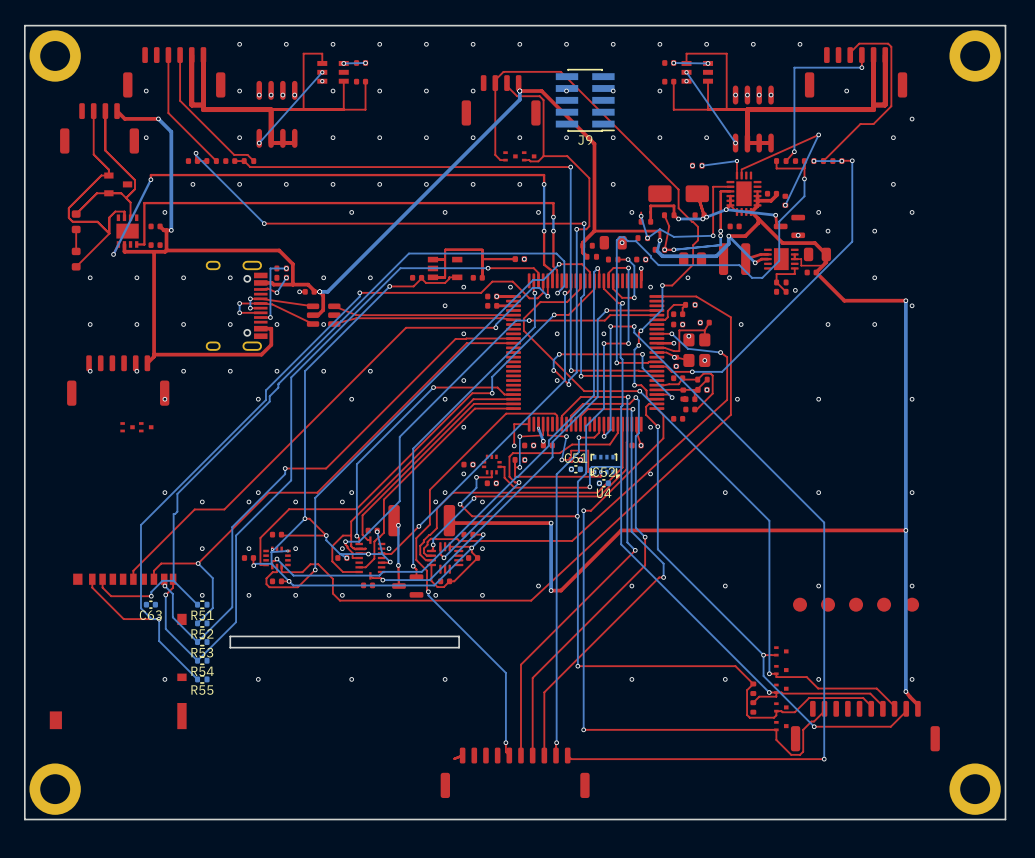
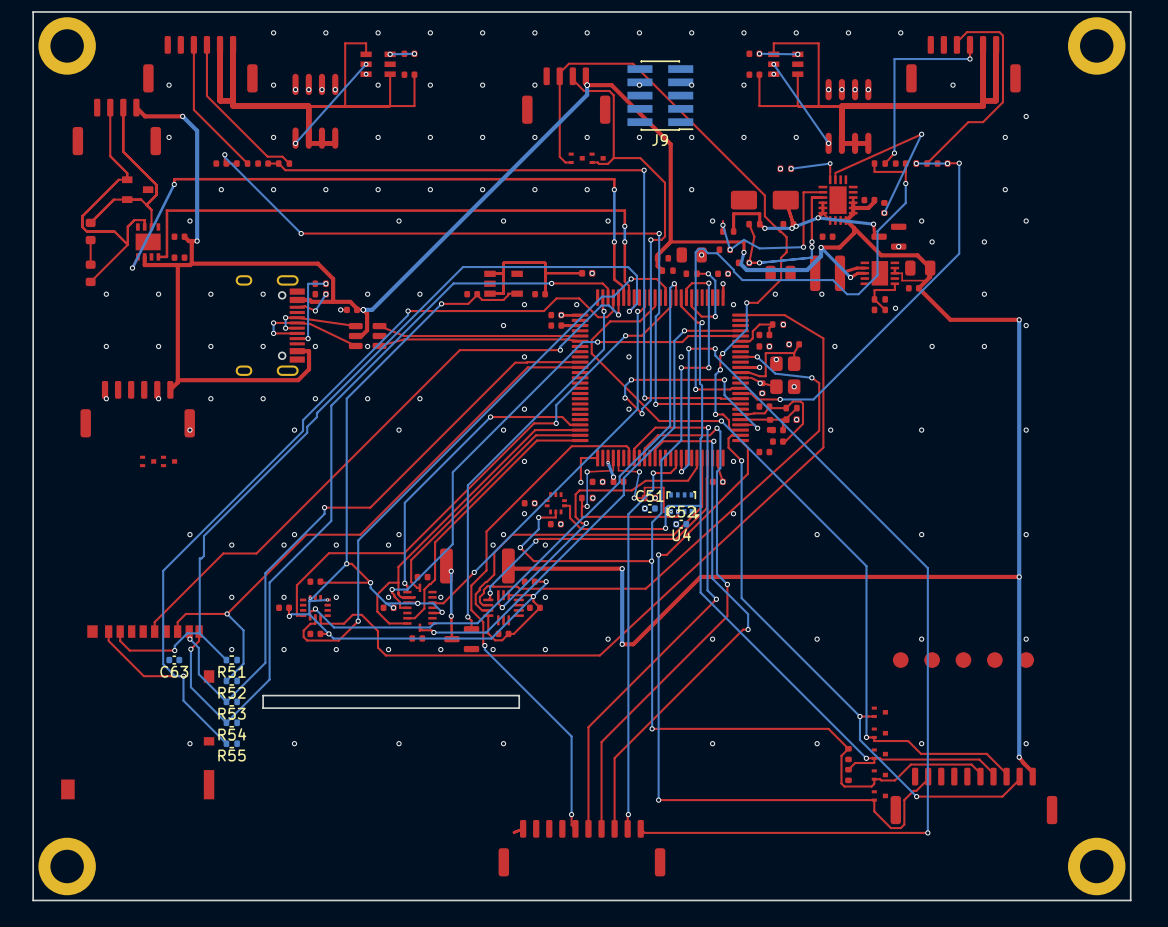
bottom track: (377, 531) (382, 554) -> none
via: (377, 531) -> none

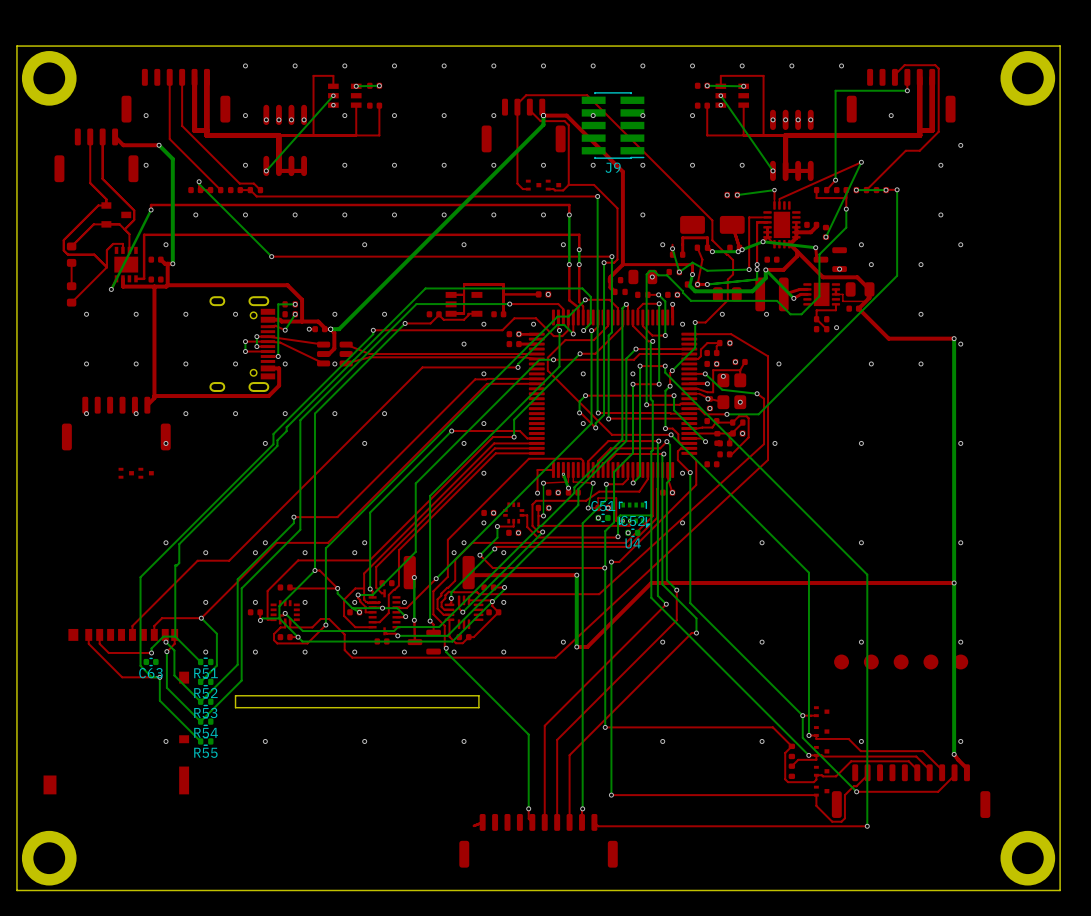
bottom track: (310, 598) (309, 601) (327, 599) -> none
via: (310, 598) -> none
via: (327, 599) -> none

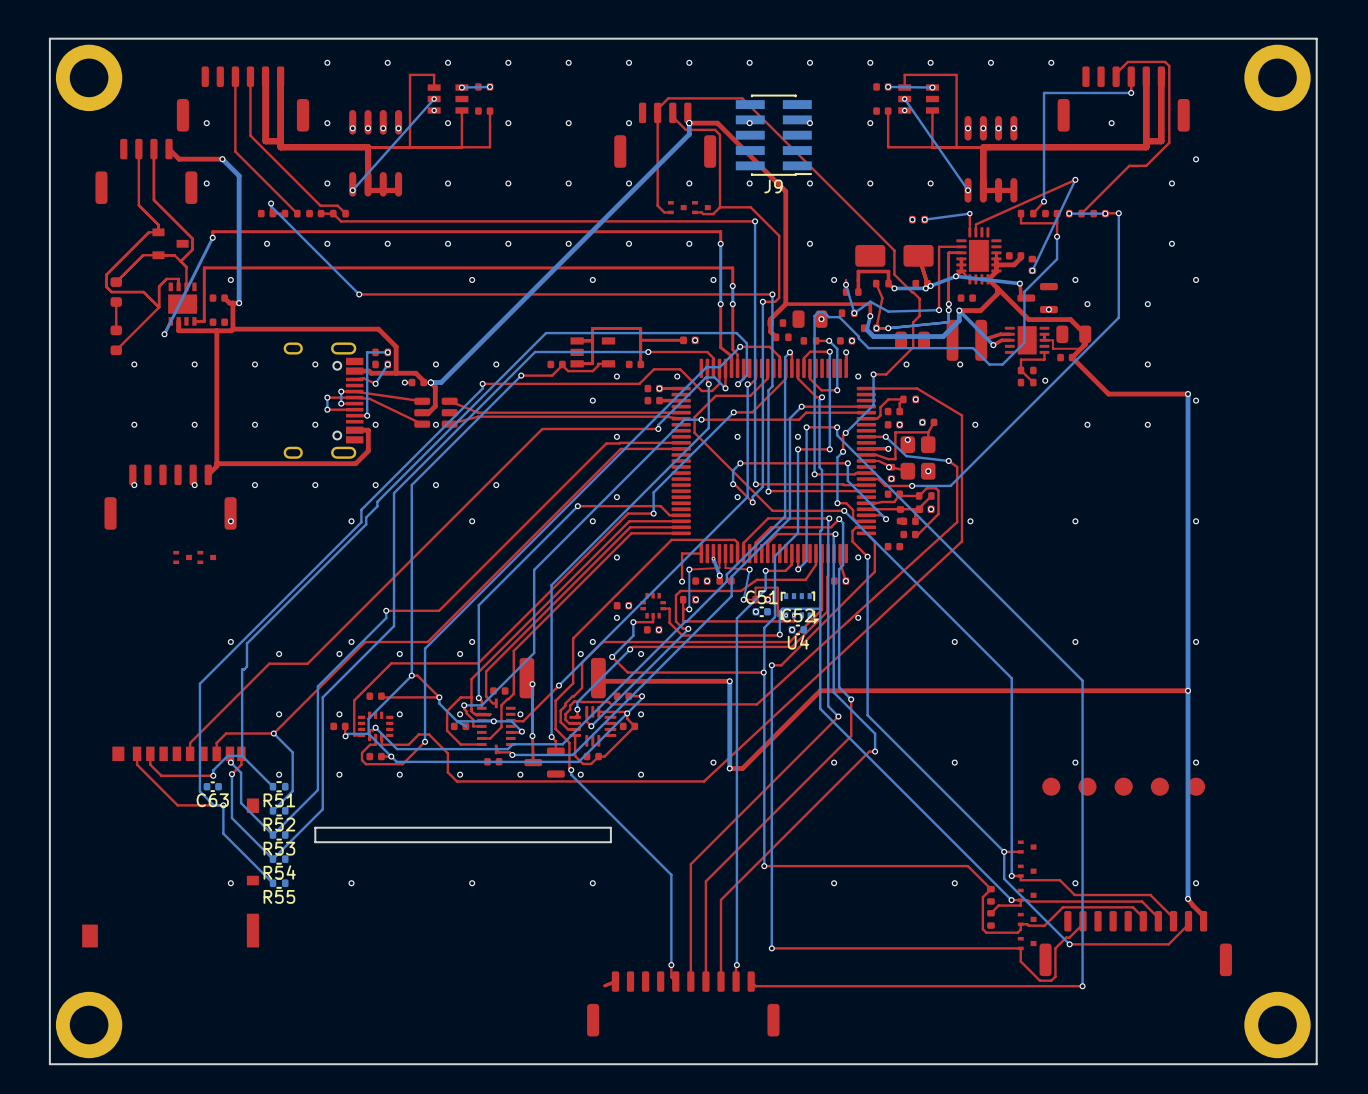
via: (359, 612) -> none

